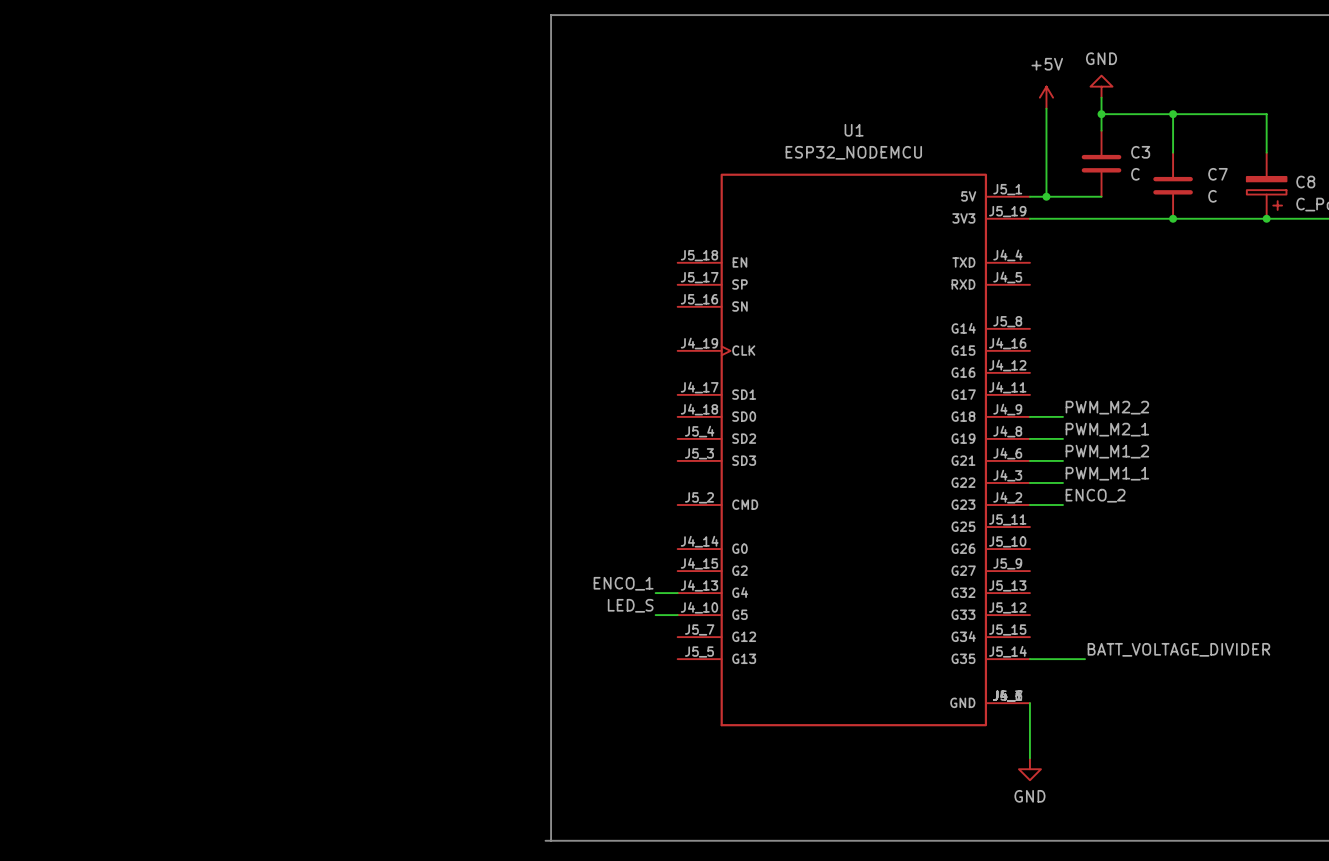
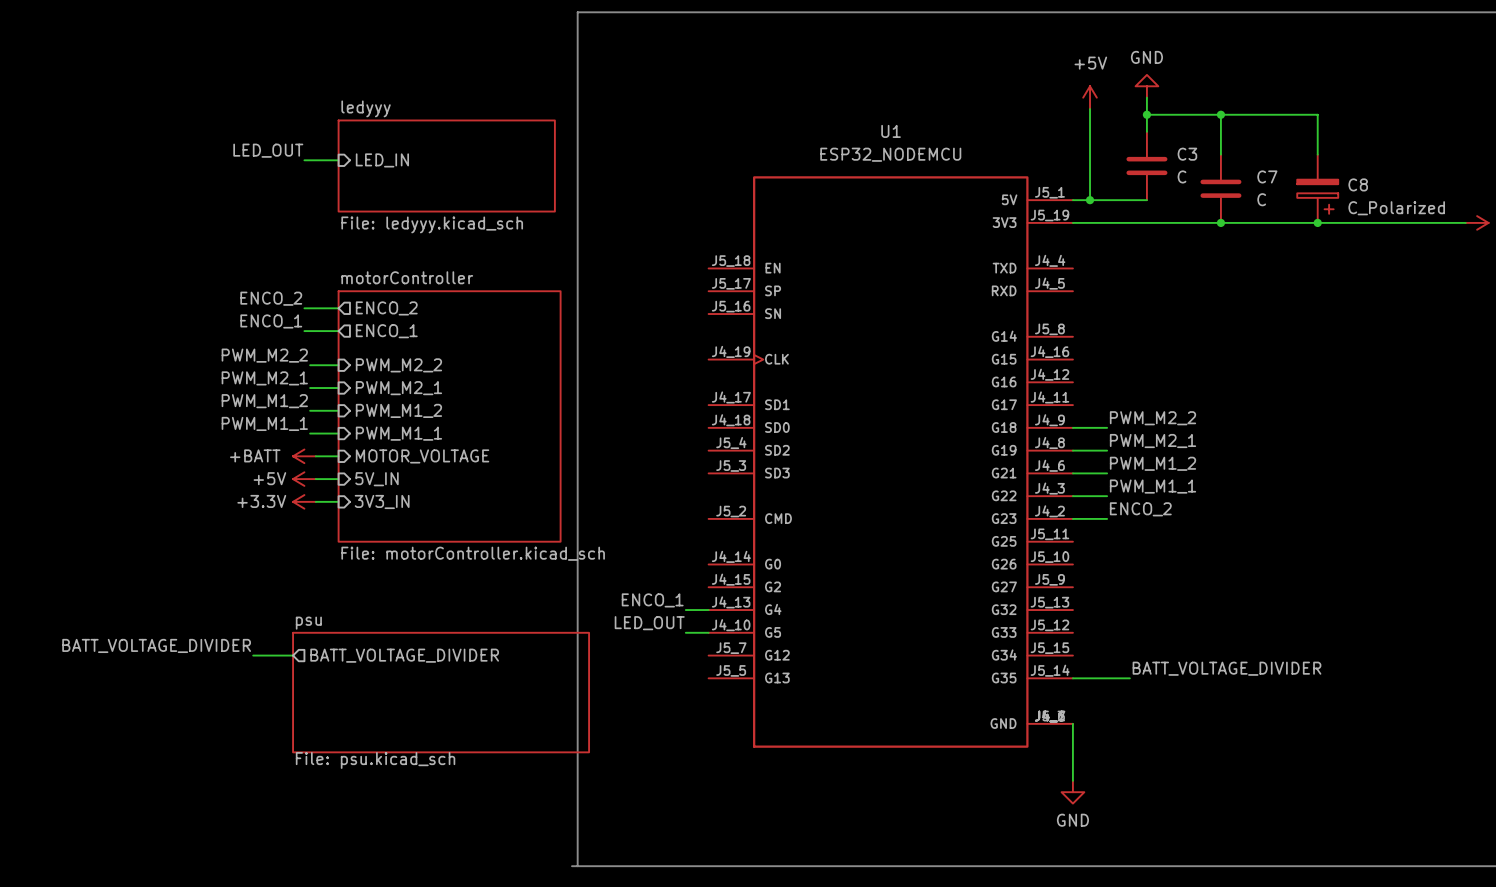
label: none -> LED_OUT (268, 150)
wire: none -> (304, 160) (338, 160)
sheet pin: none -> LED_IN (382, 160)
sheet ledyyy: none -> File: ledyyy.kicad_sch (446, 166)
label: none -> ENCO_2 (271, 298)
wire: none -> (304, 308) (338, 308)
sheet pin: none -> ENCO_2 (386, 308)
label: none -> ENCO_1 (271, 321)
wire: none -> (304, 331) (338, 331)
sheet pin: none -> ENCO_1 (386, 331)
label: none -> PWM_M2_2 (264, 355)
wire: none -> (310, 365) (338, 365)
sheet pin: none -> PWM_M2_2 (398, 365)
label: none -> PWM_M2_1 (264, 378)
wire: none -> (310, 388) (338, 388)
sheet pin: none -> PWM_M2_1 (398, 388)
label: none -> PWM_M1_2 (264, 401)
wire: none -> (310, 410) (338, 410)
sheet pin: none -> PWM_M1_2 (398, 410)
sheet motorController: none -> File: motorController.kicad_sch (449, 416)
label: none -> PWM_M1_1 (264, 423)
wire: none -> (310, 433) (338, 433)
sheet pin: none -> PWM_M1_1 (398, 433)
power symbol: none -> +BATT (304, 456)
wire: none -> (315, 456) (338, 456)
sheet pin: none -> MOTOR_VOLTAGE (422, 456)
power symbol: none -> +5V (304, 479)
wire: none -> (315, 479) (338, 479)
sheet pin: none -> 5V_IN (376, 479)
power symbol: none -> +3.3V (304, 501)
wire: none -> (315, 501) (338, 501)
sheet pin: none -> 3V3_IN (382, 501)
label: LED_S (630, 605) -> LED_OUT (649, 623)
label: none -> BATT_VOLTAGE_DIVIDER (156, 645)
wire: none -> (253, 655) (293, 655)
sheet pin: none -> BATT_VOLTAGE_DIVIDER (404, 655)
sheet psu: none -> File: psu.kicad_sch (441, 692)

